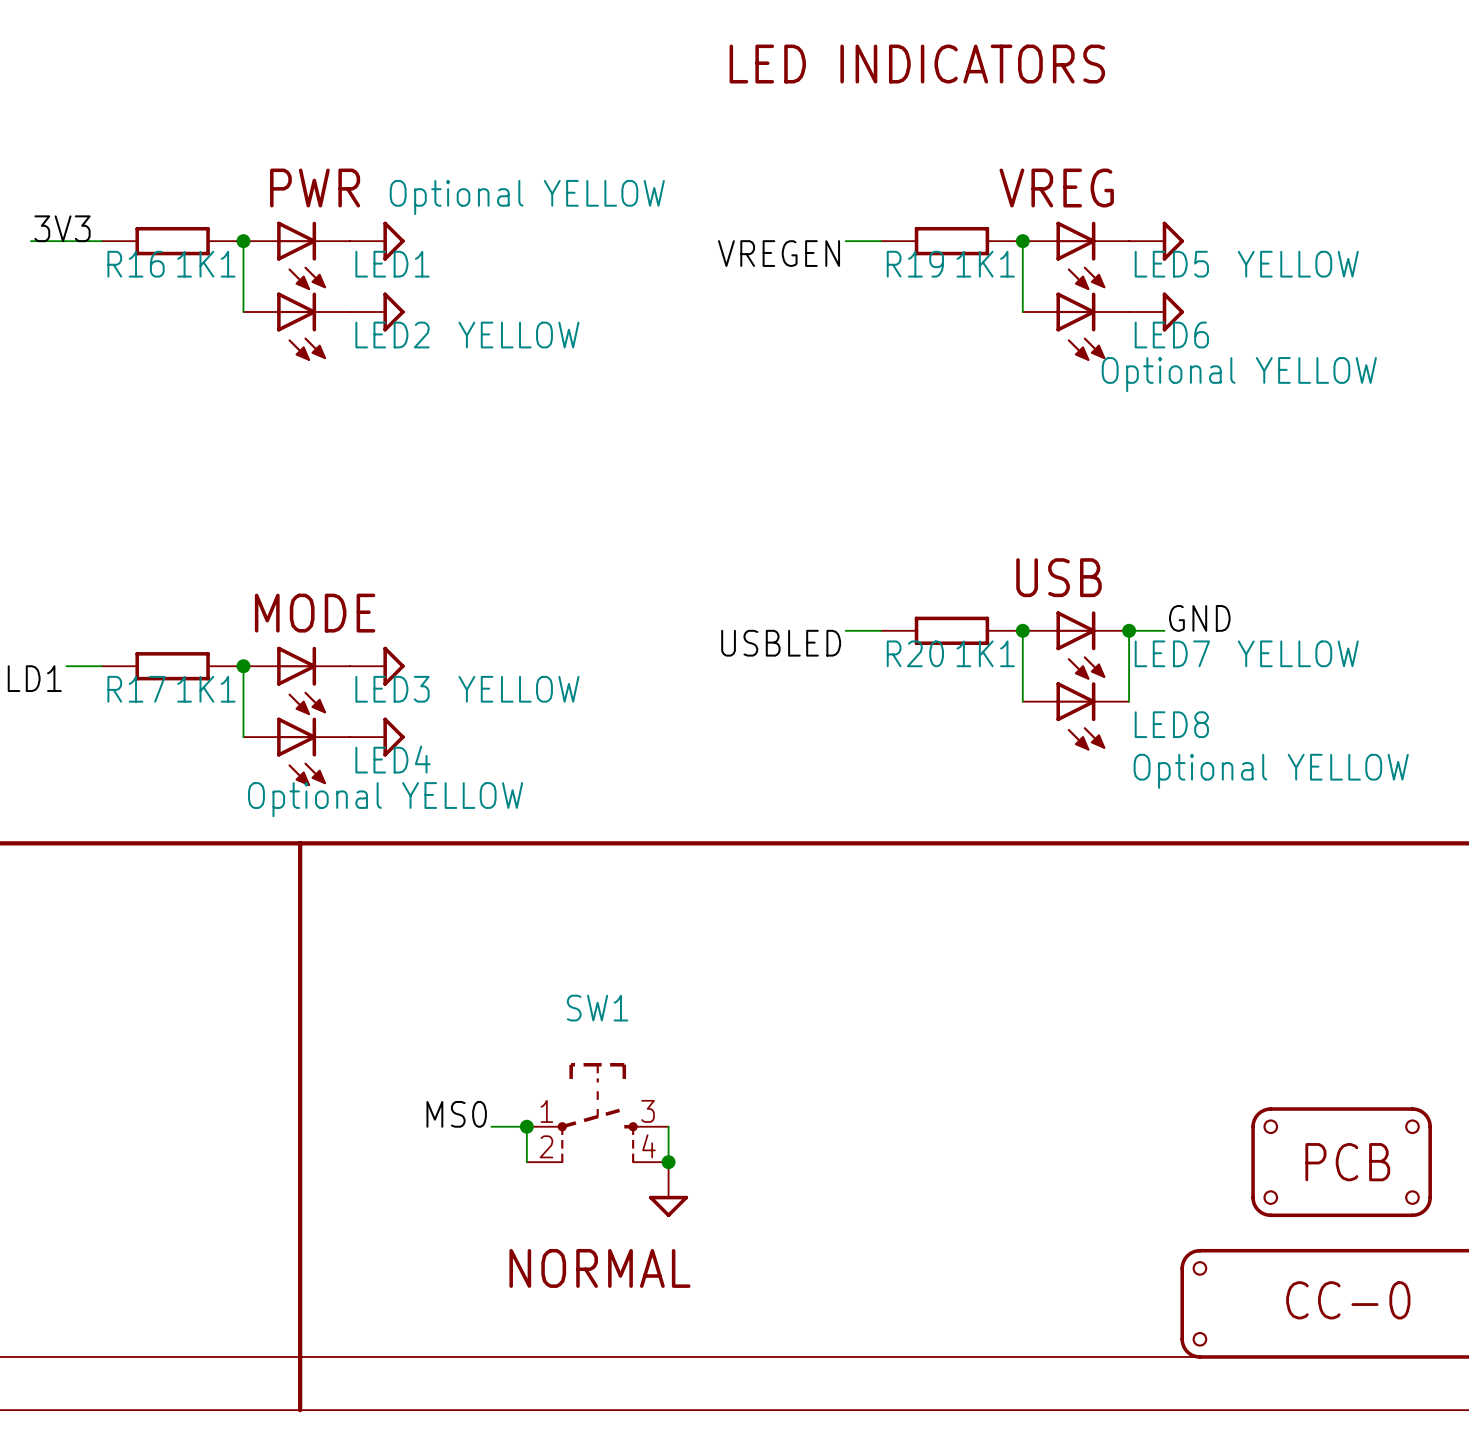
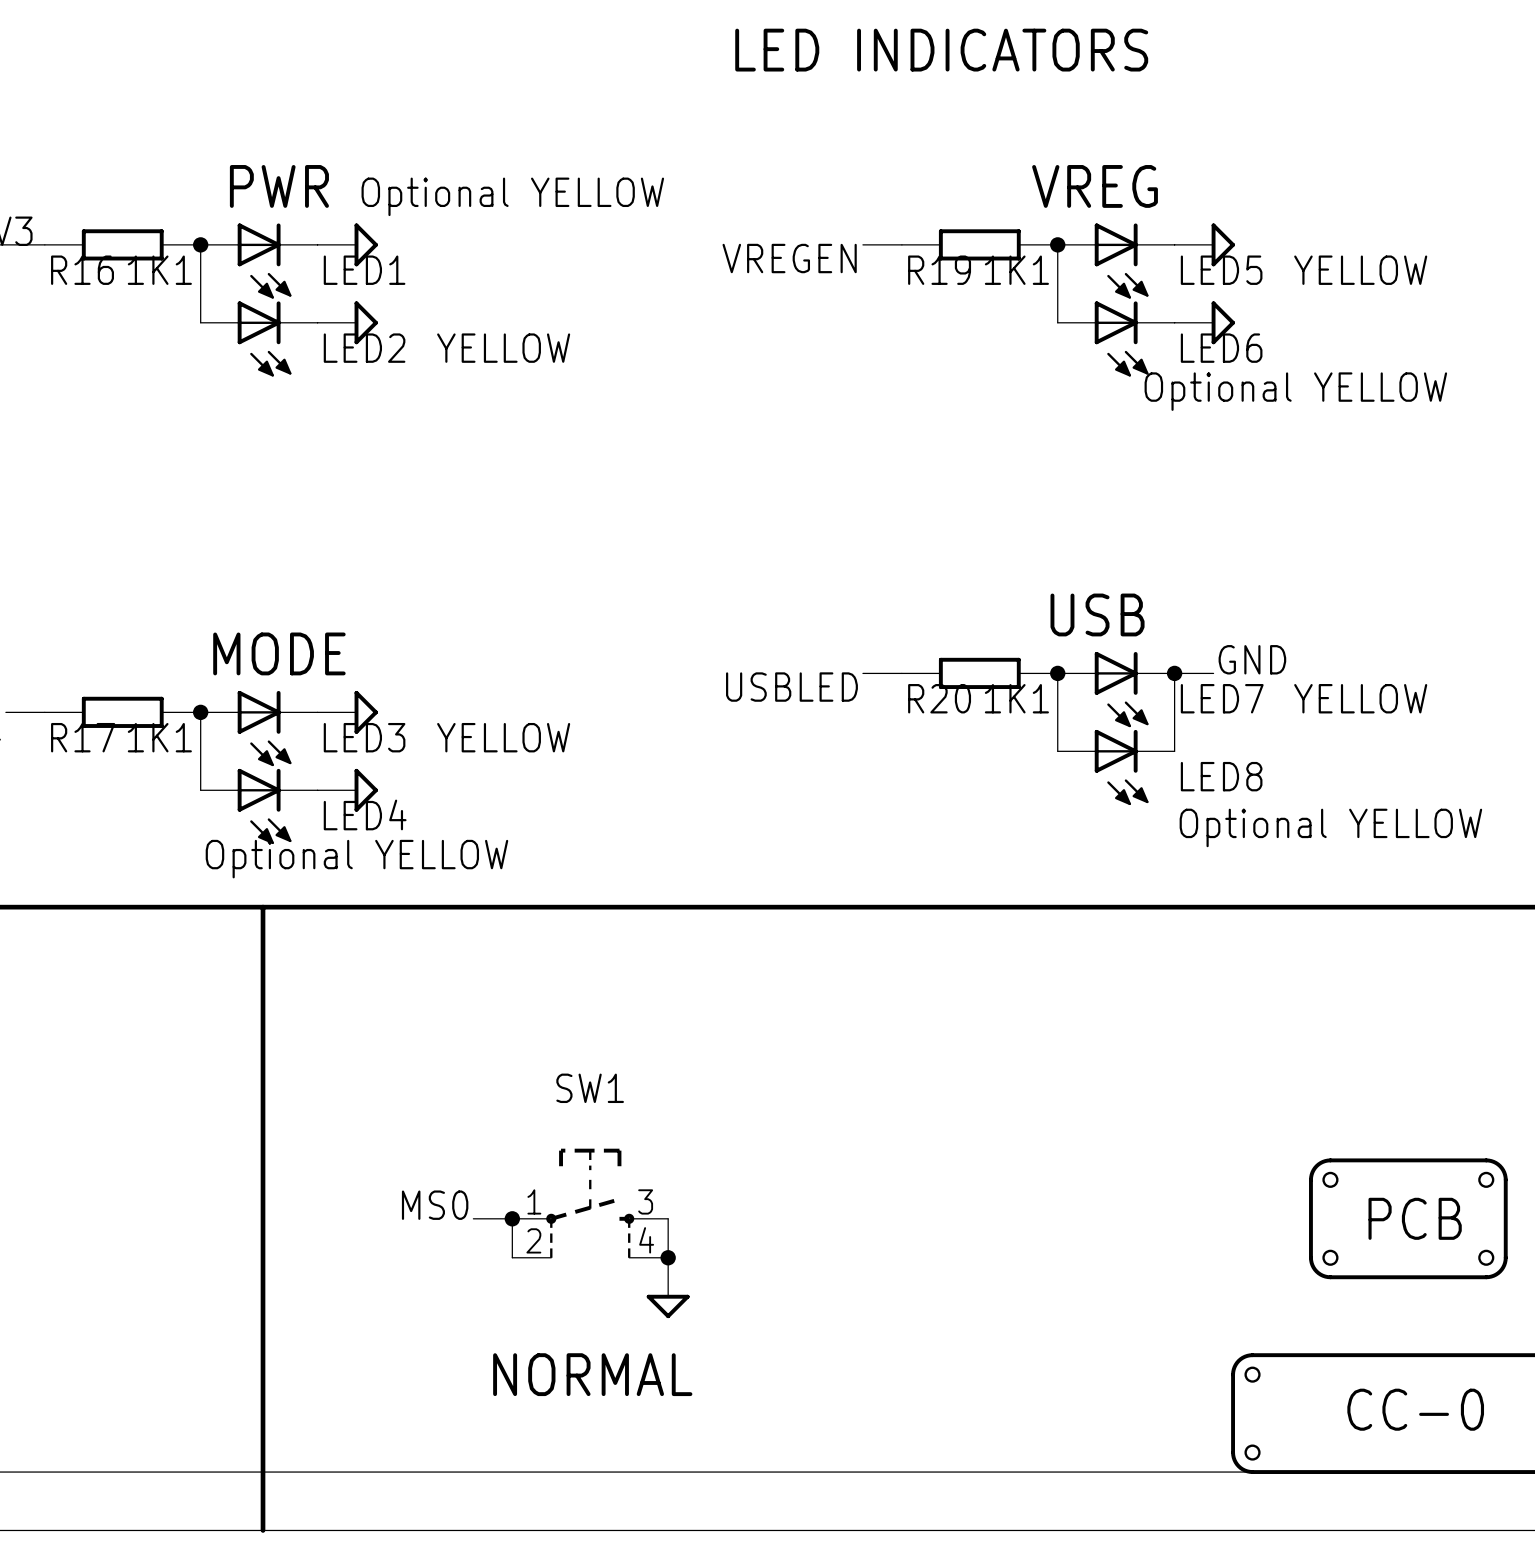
part position: (1341, 1162) -> (1408, 1218)

